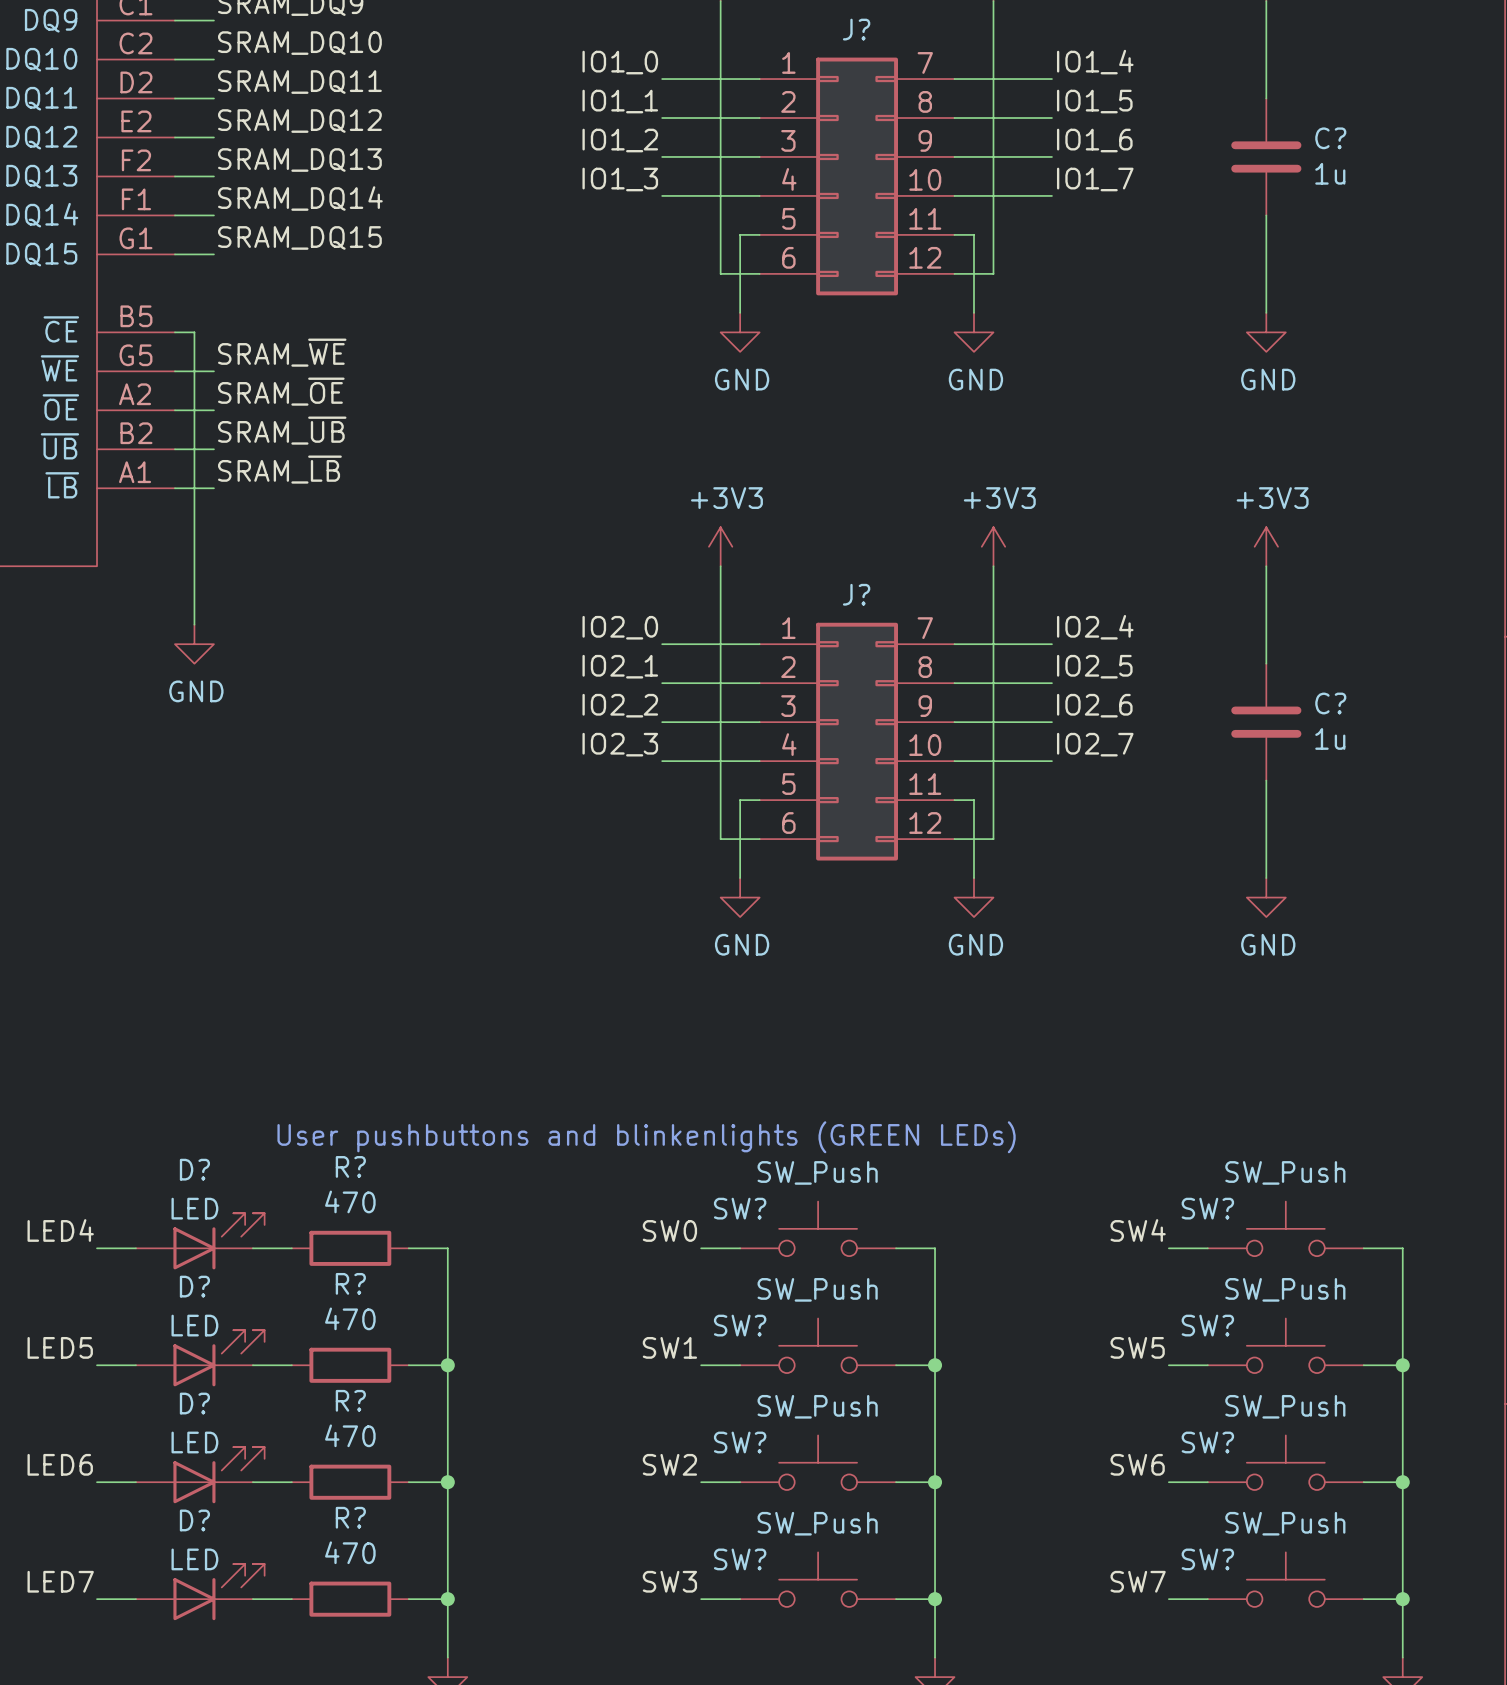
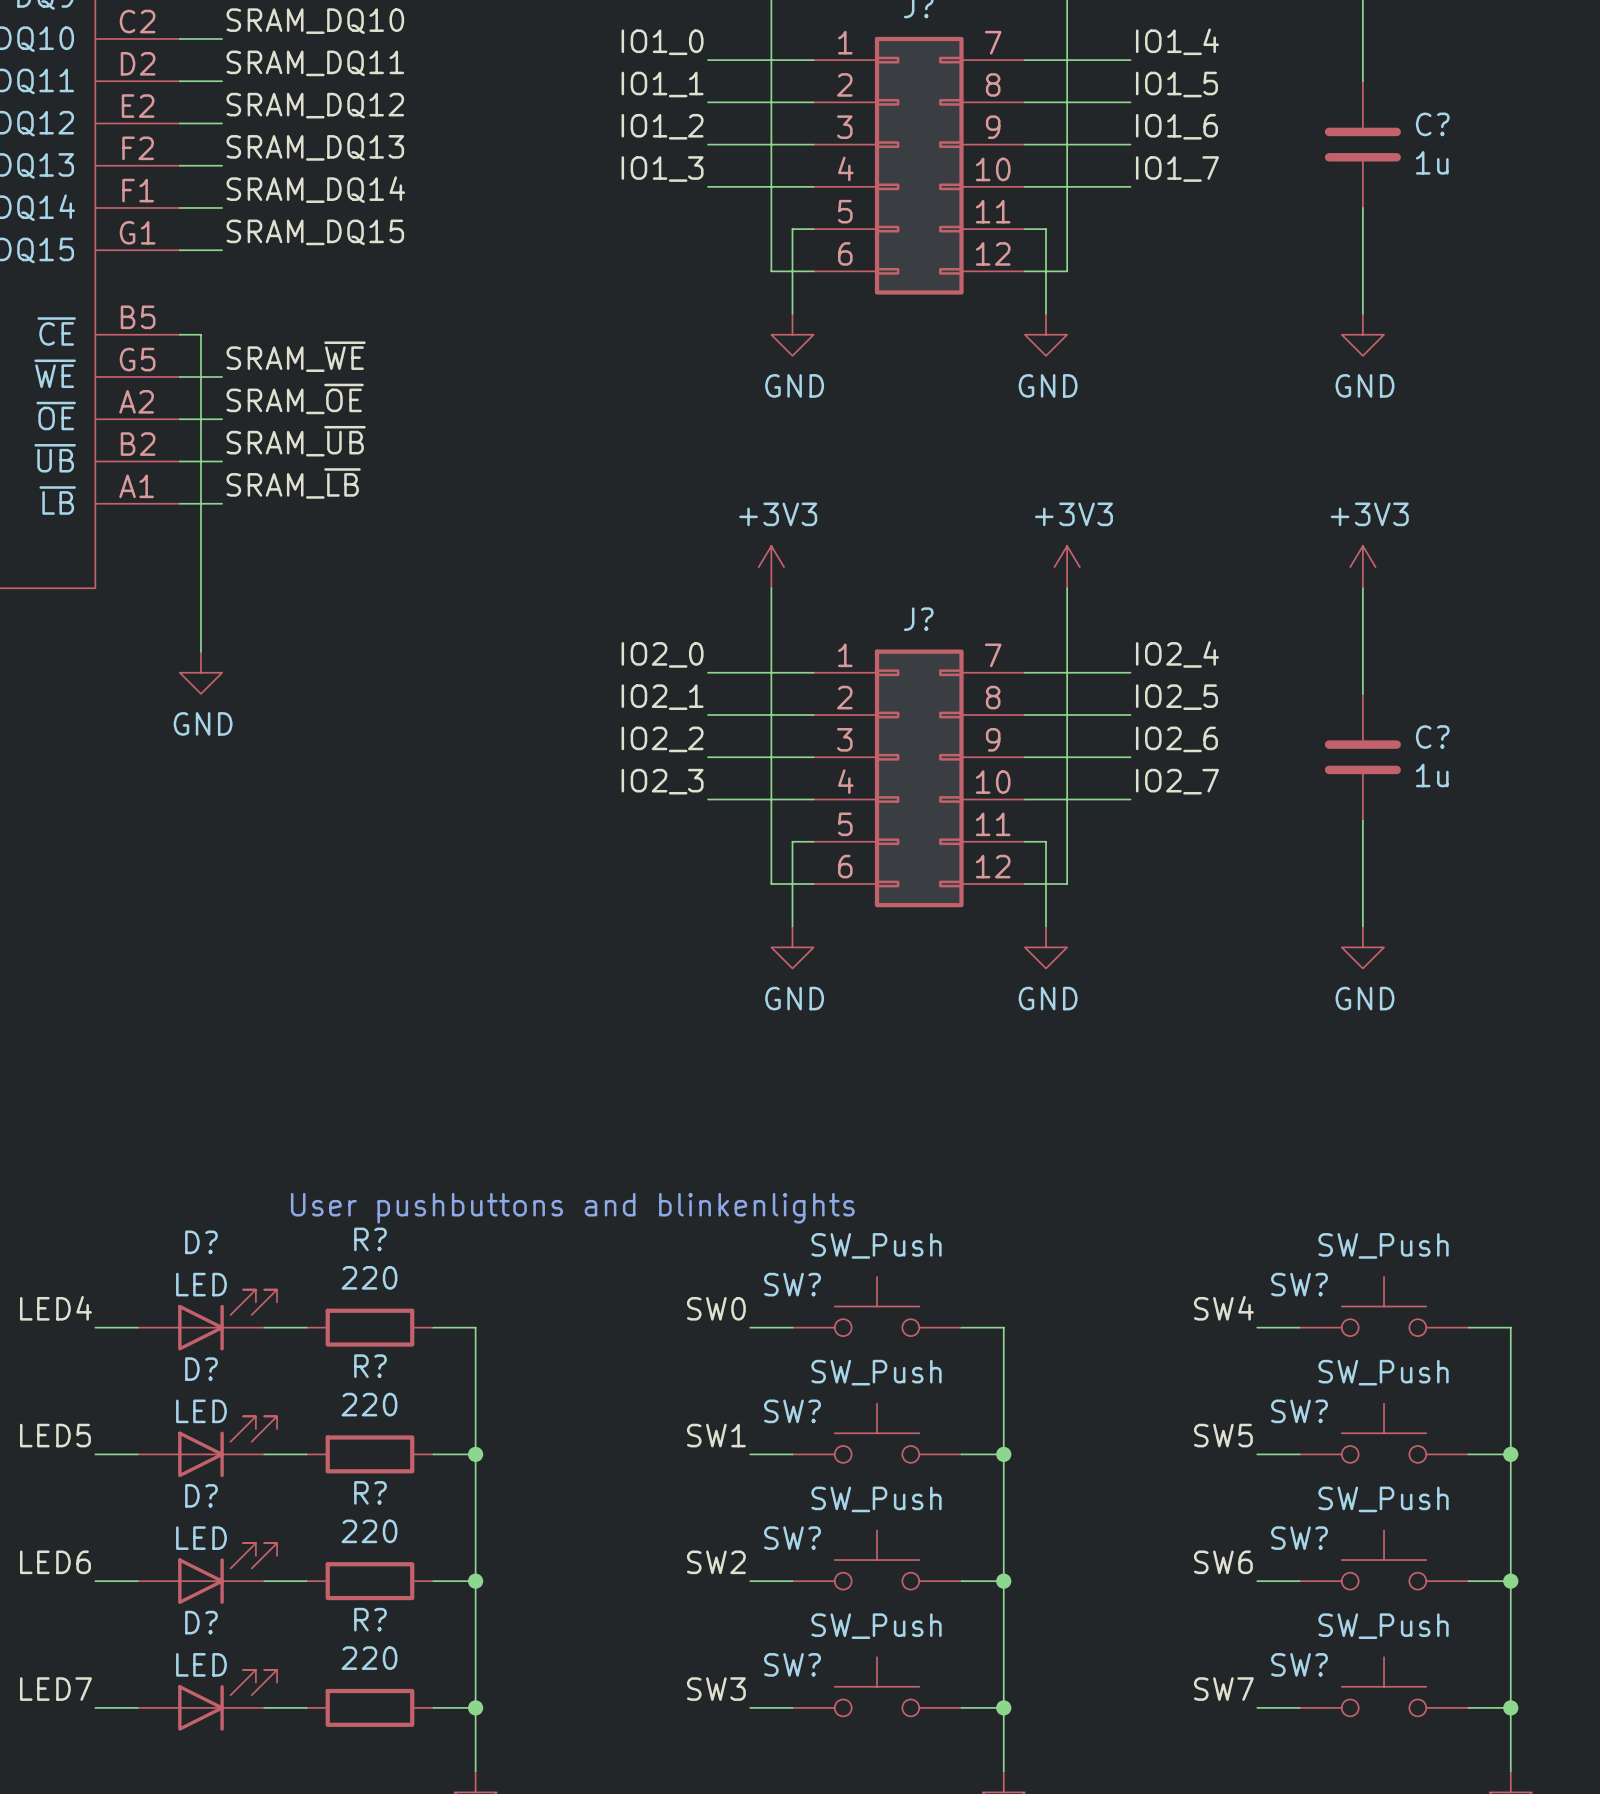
text: User pushbuttons and blinkenlights (GREEN LEDs) (646, 1137) -> User pushbuttons and blinkenlights (572, 1208)
R? value: 470 (350, 1201) -> 220 (369, 1277)
R? value: 470 (350, 1318) -> 220 (369, 1404)
R? value: 470 (350, 1435) -> 220 (369, 1531)
R? value: 470 (350, 1552) -> 220 (369, 1658)

